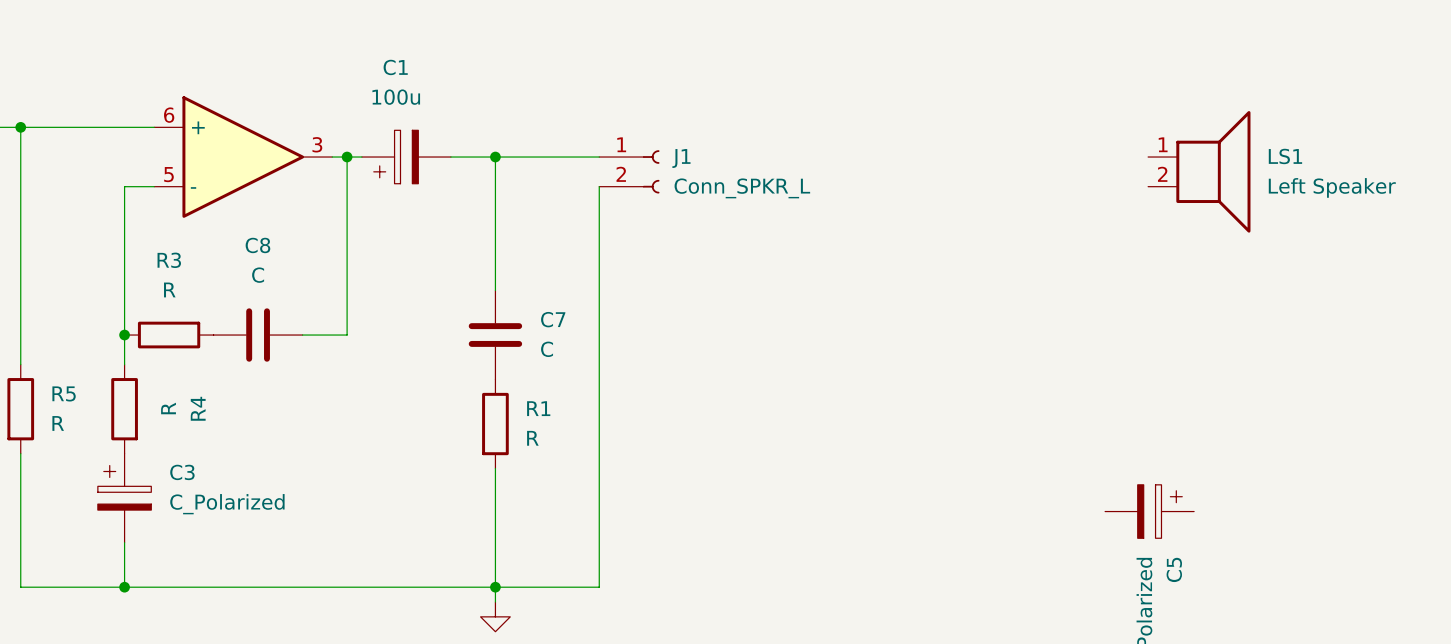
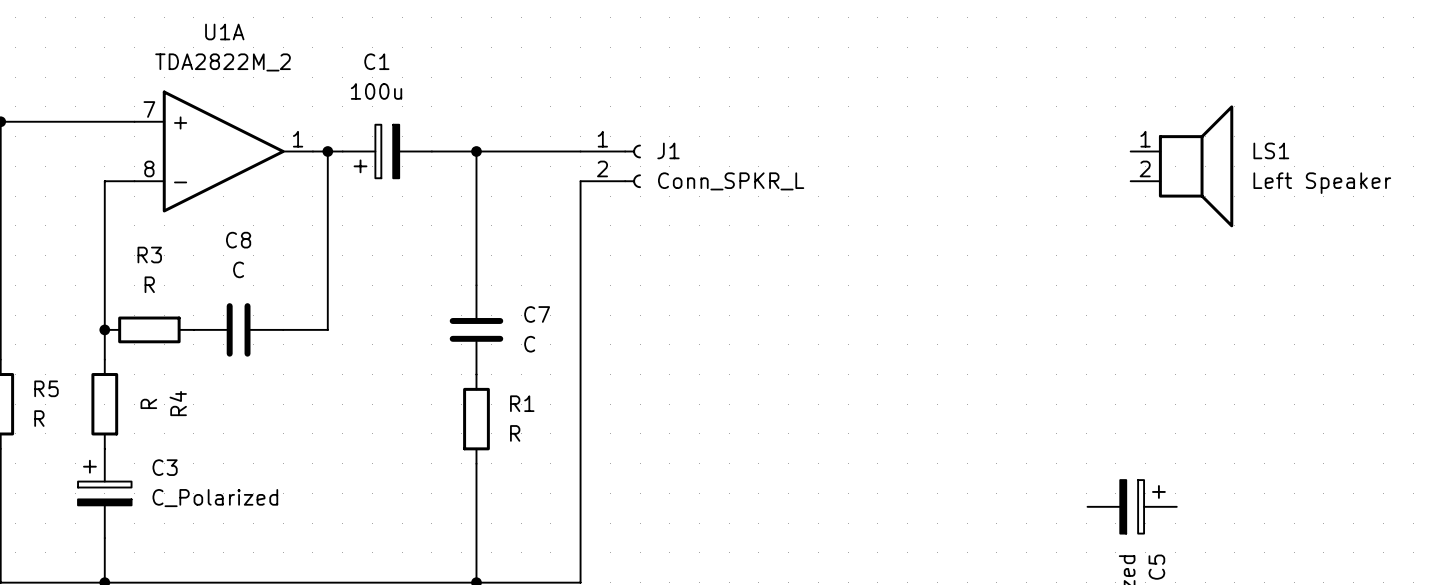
U1A name: none -> U1A (224, 31)
U1A value: none -> TDA2822M_2 (223, 62)
U1A pin number: 6 (169, 115) -> 7 (149, 109)
U1A pin number: 3 (317, 144) -> 1 (298, 139)
U1A pin number: 5 (168, 174) -> 8 (149, 168)

